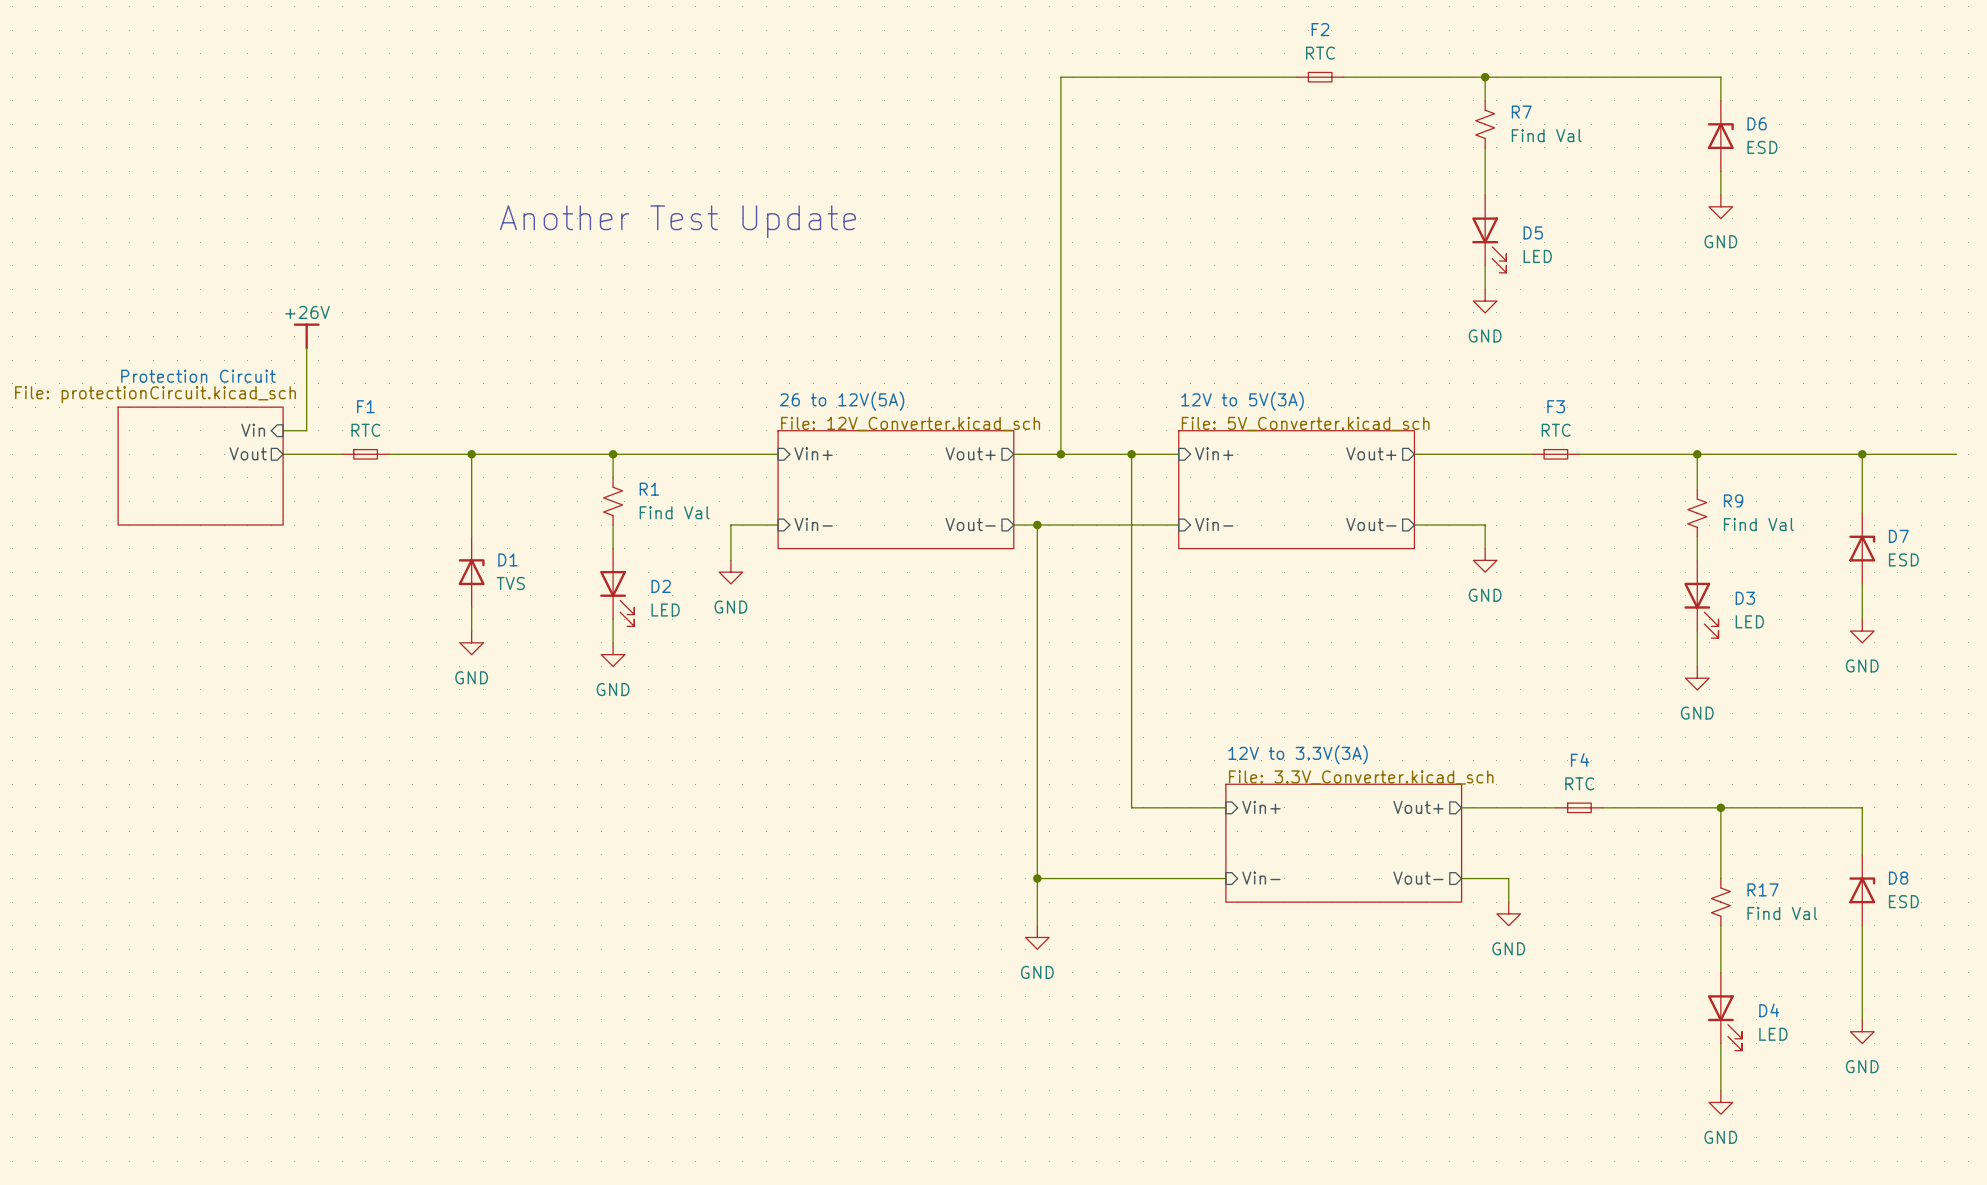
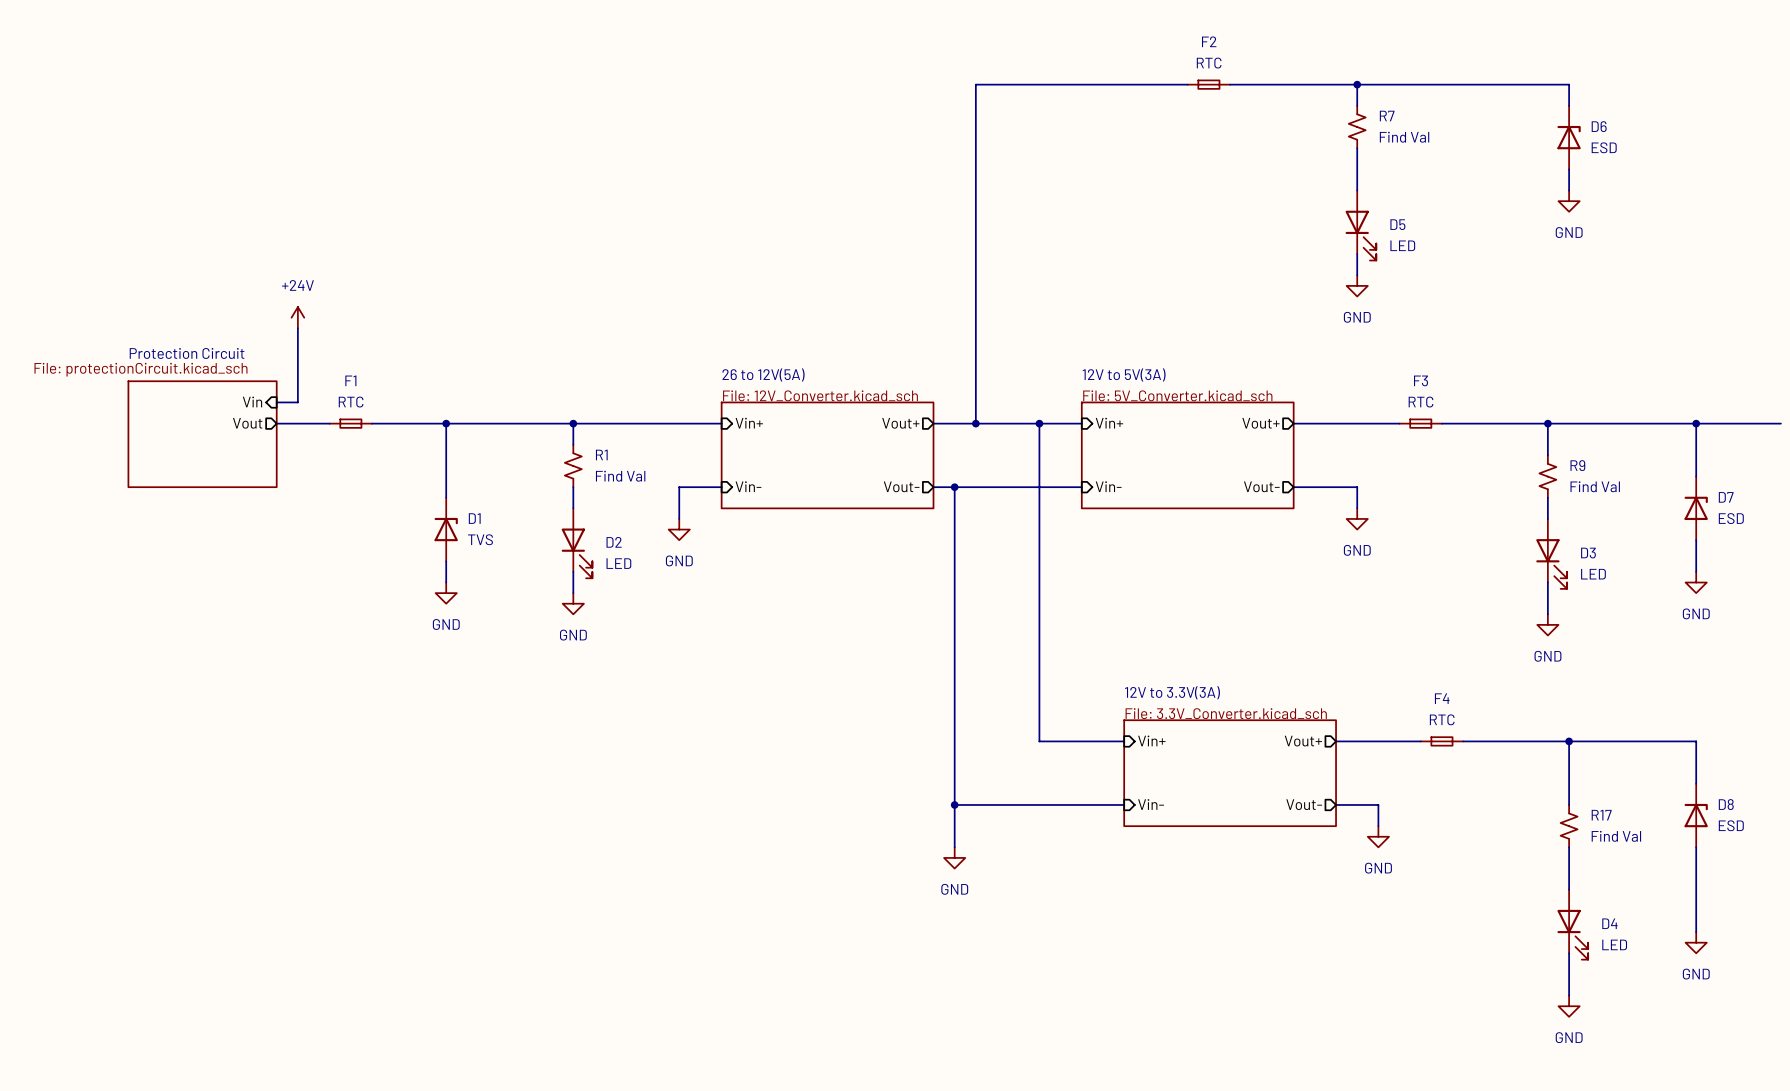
text: Another Test Update (677, 221) -> none
power symbol: +26V (306, 336) -> +24V (297, 317)

